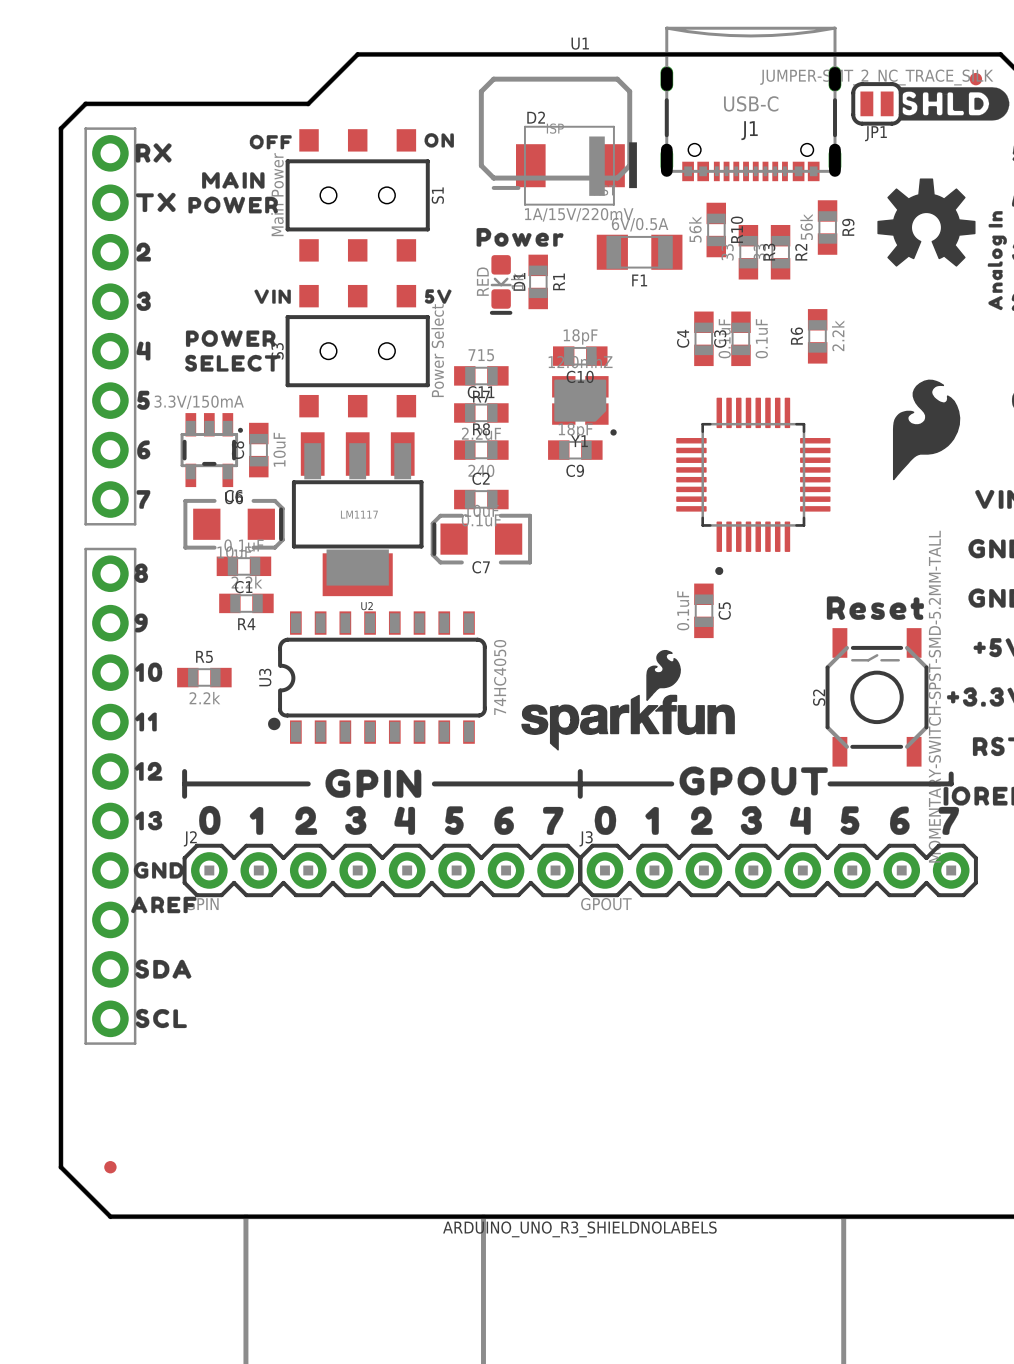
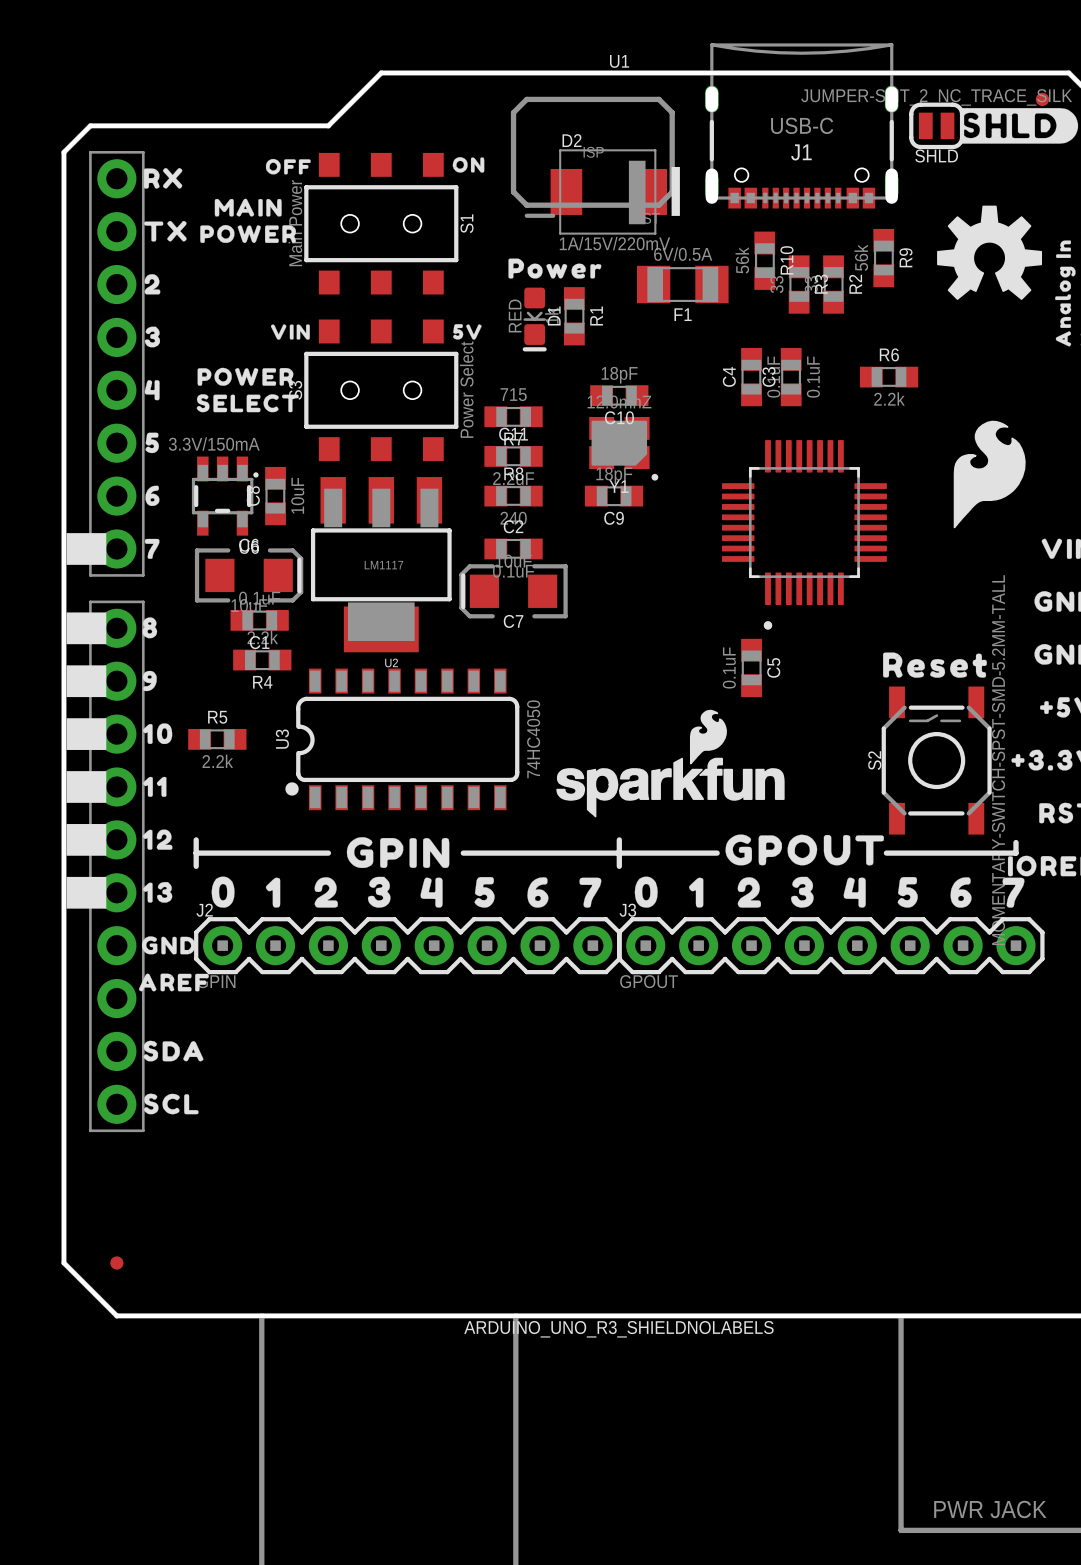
JP1 name: JP1 (875, 133) -> SHLD (936, 156)
R6 rotation: 0° (817, 336) -> 90° clockwise (889, 377)
drawing: none -> [66, 533, 107, 565]
drawing: none -> [66, 612, 107, 909]

